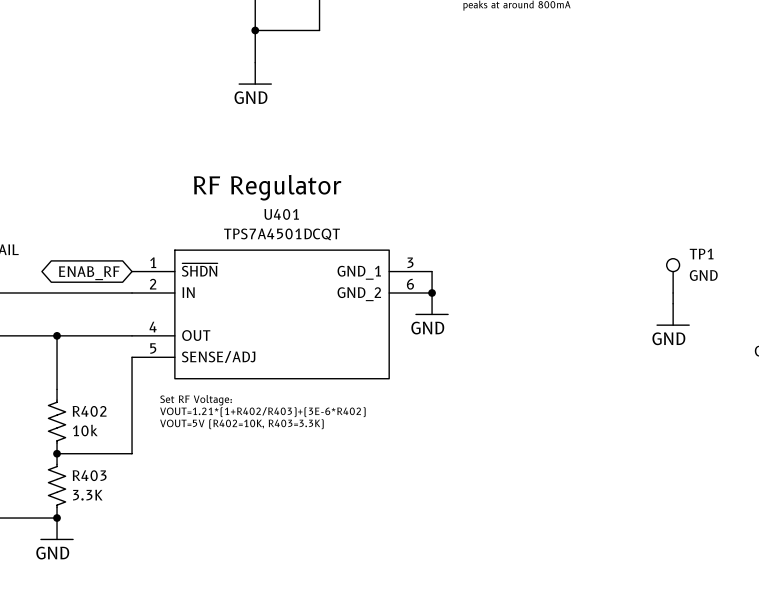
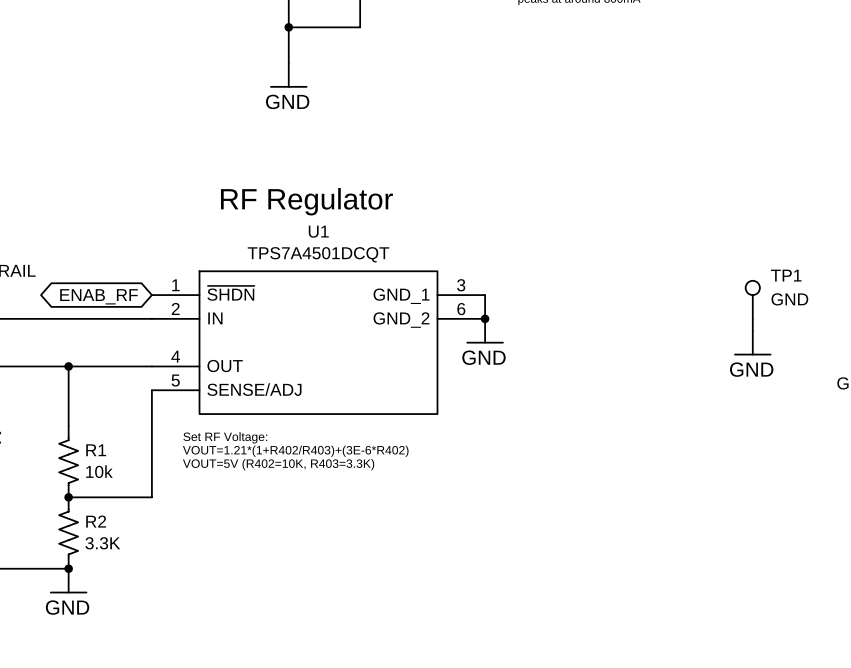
U401 name: U401 (281, 214) -> U1 (318, 231)
R402 name: R402 (89, 411) -> R1 (96, 450)
R403 name: R403 (89, 475) -> R2 (96, 521)

